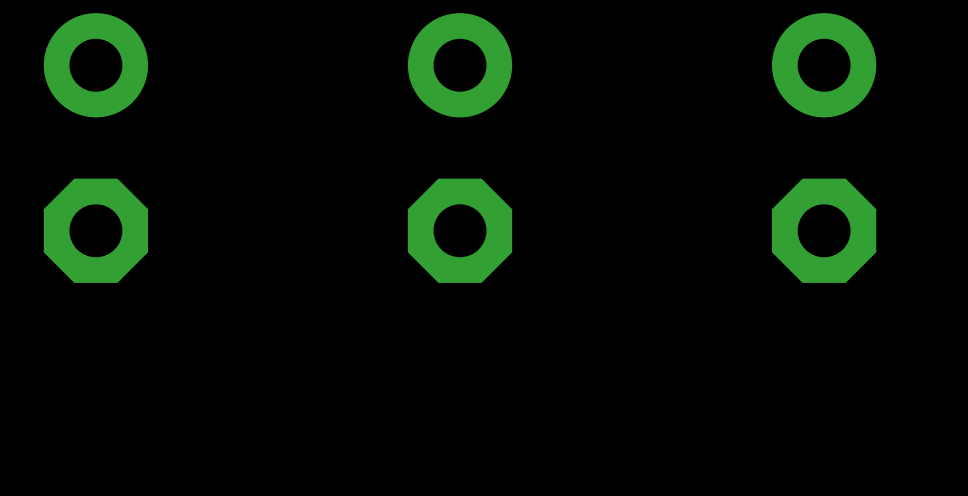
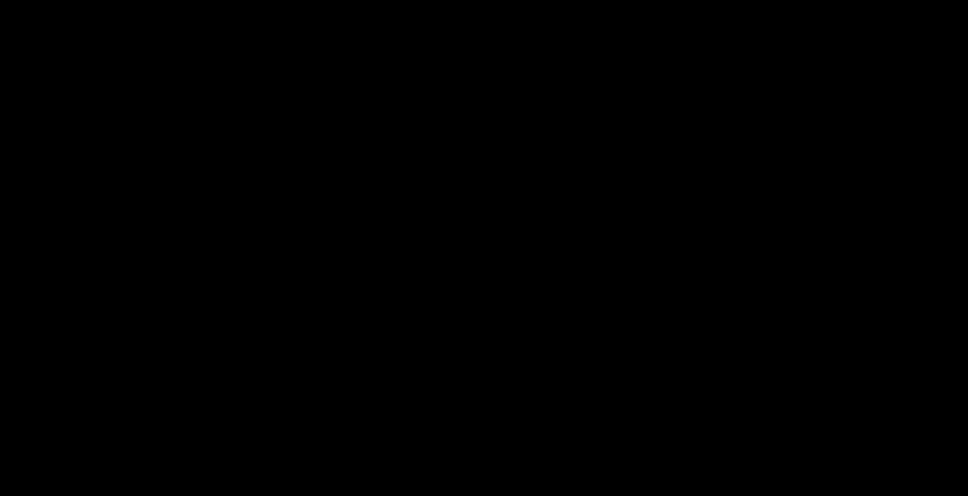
part: (95, 148) -> none
part: (460, 148) -> none
part: (824, 148) -> none

